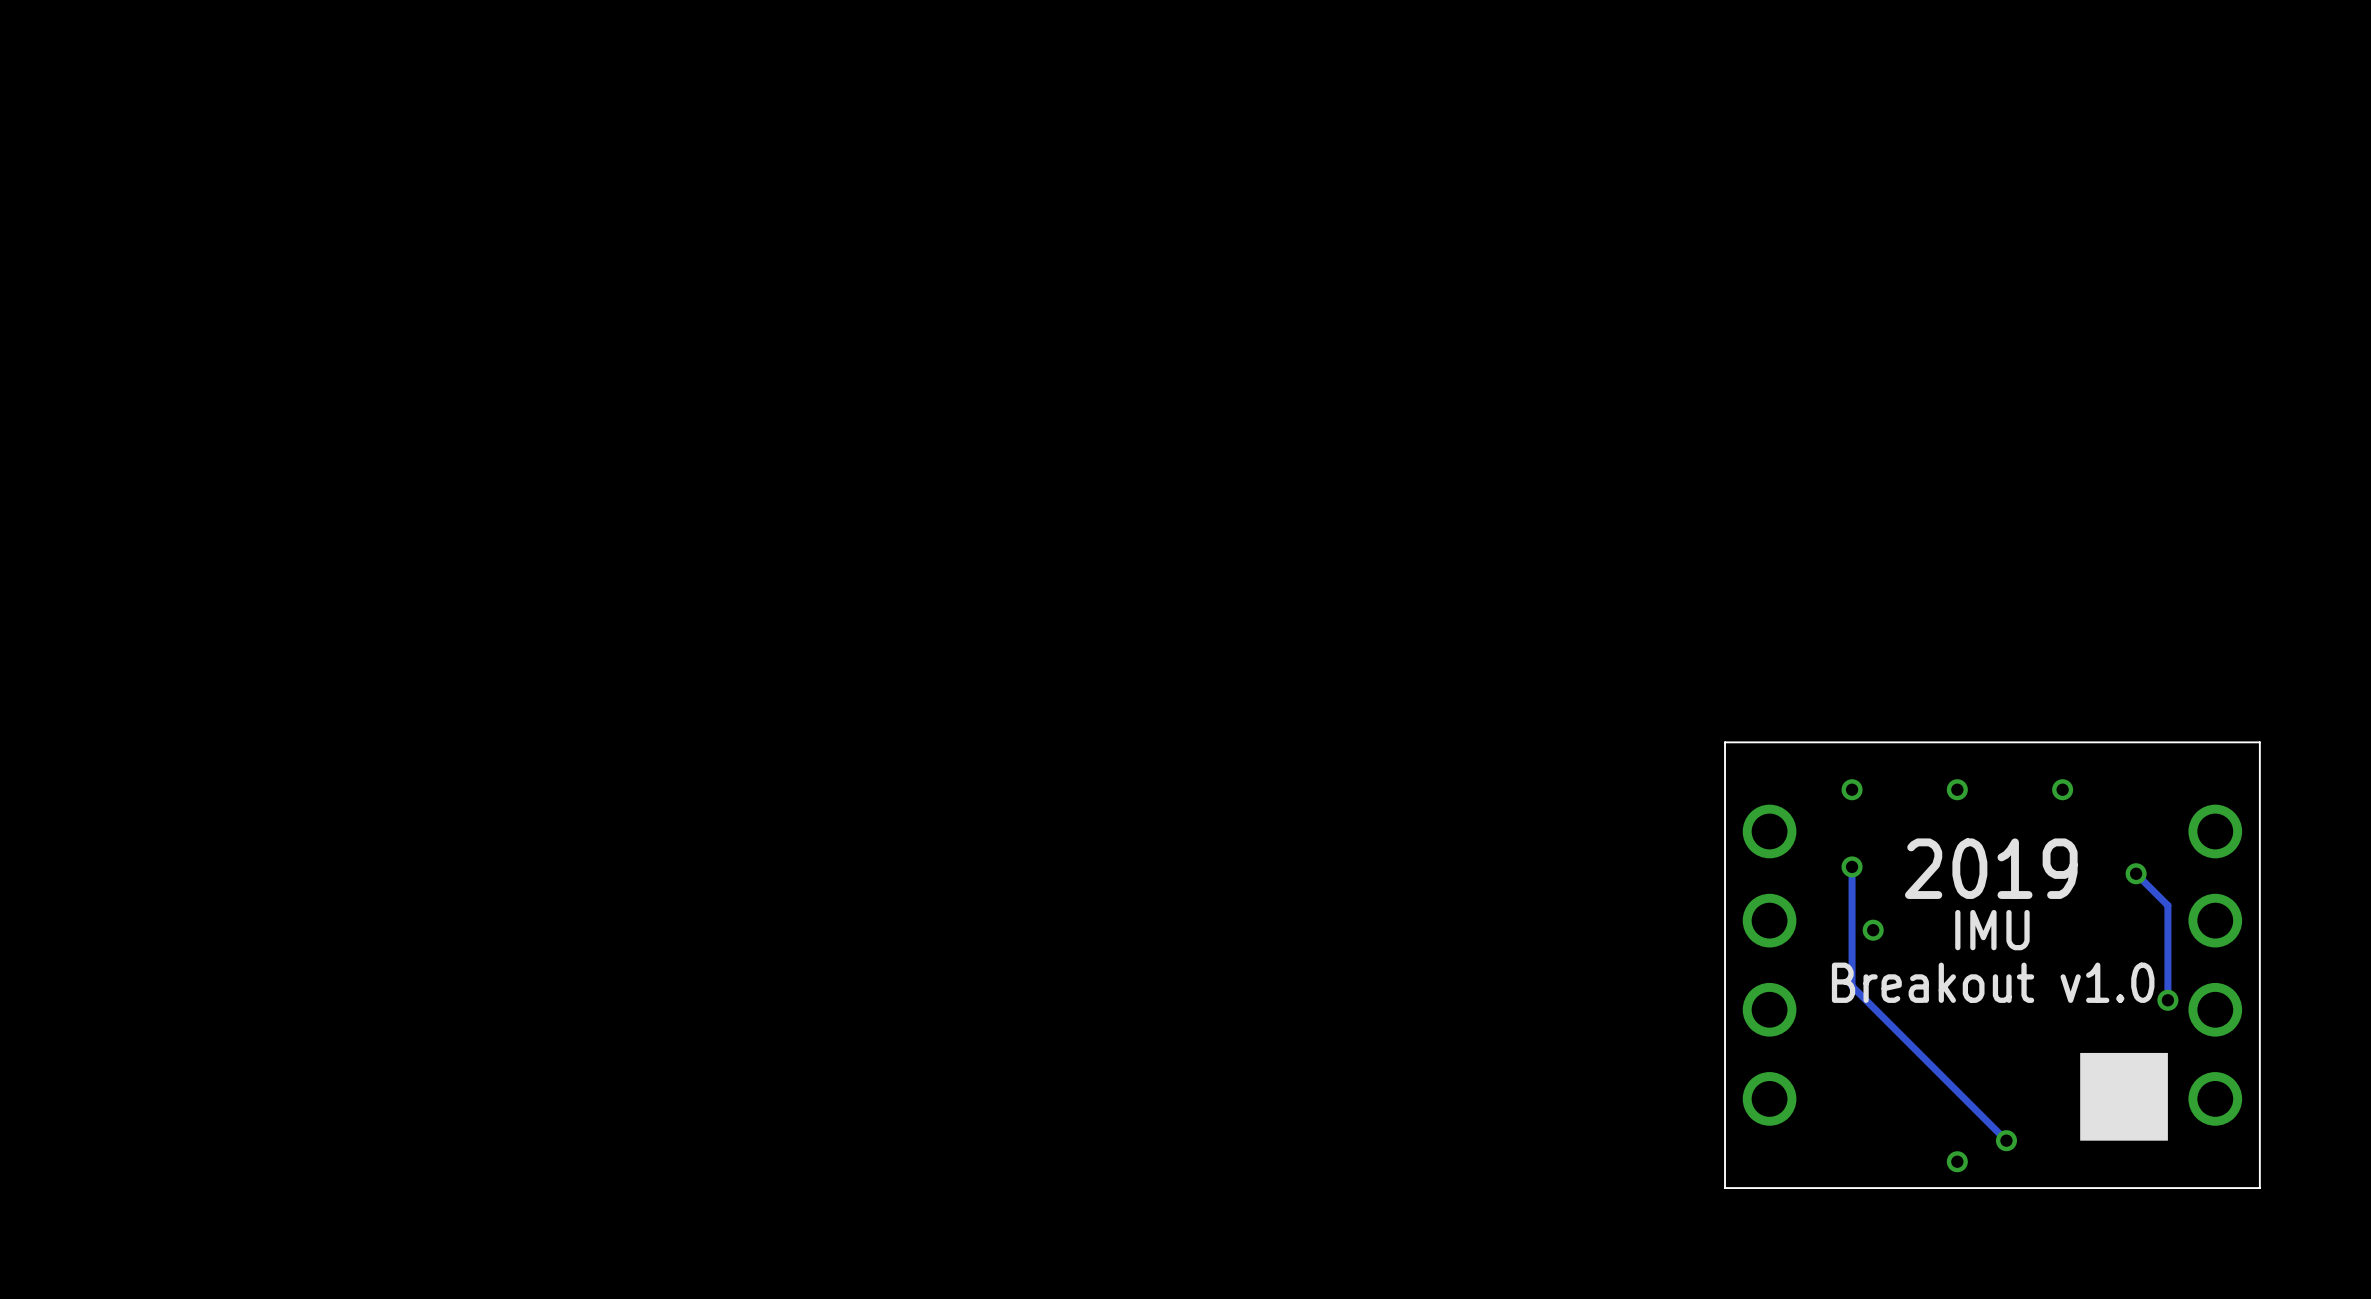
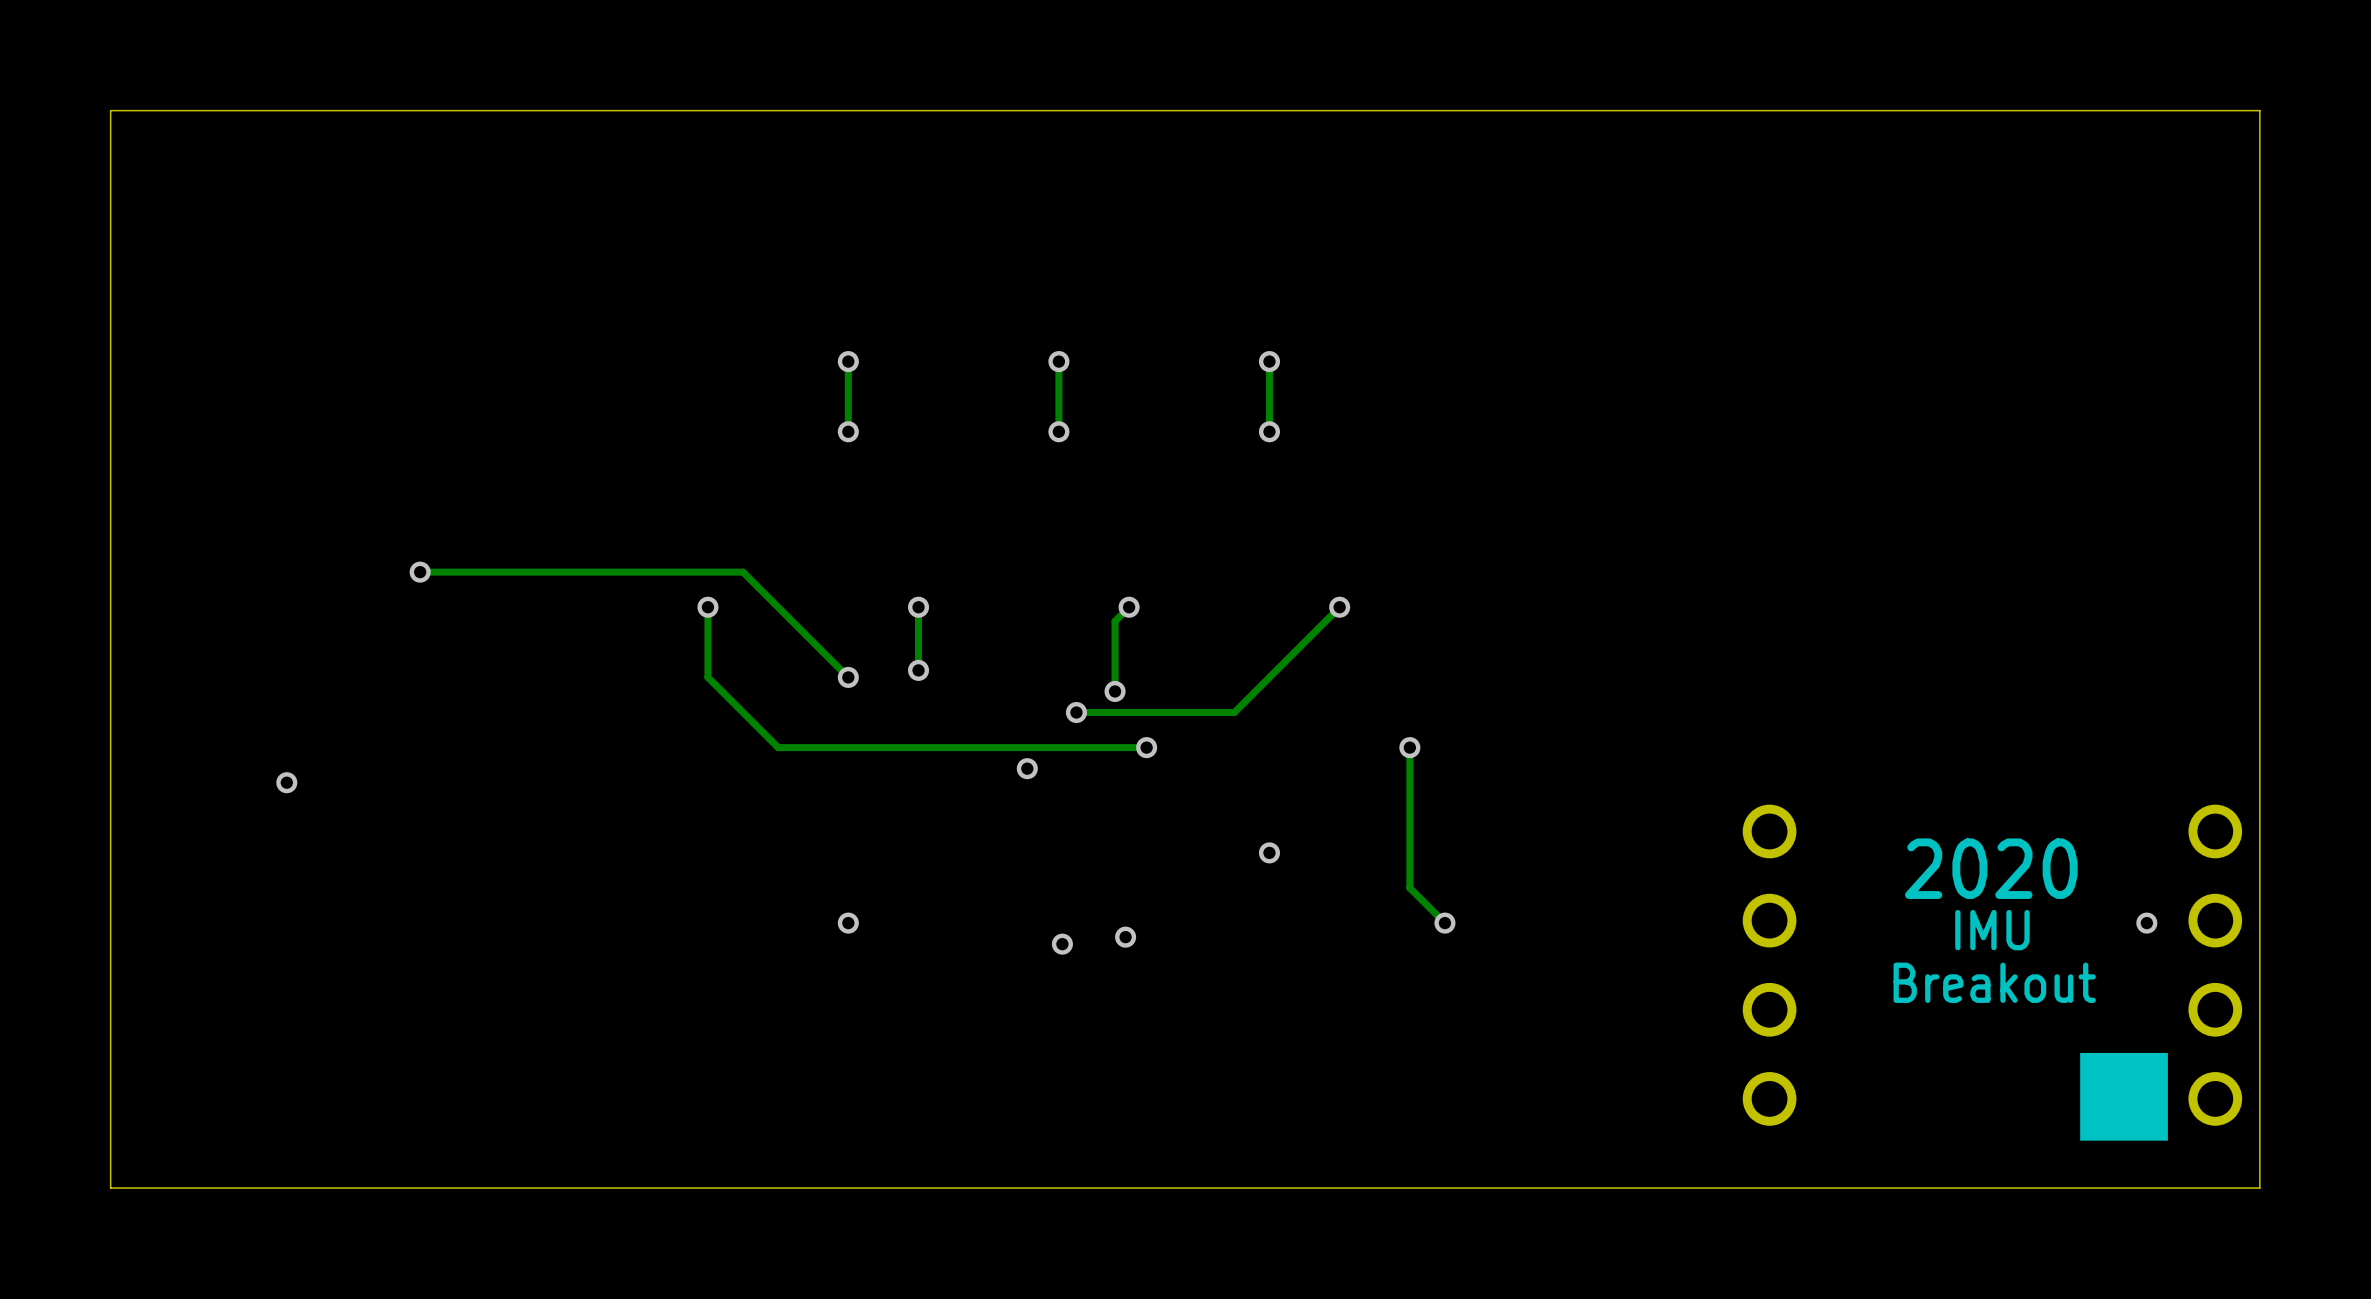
track: none -> (848, 361) (848, 431)
via: none -> (848, 361)
track: none -> (1058, 361) (1058, 431)
via: none -> (1058, 361)
track: none -> (1269, 361) (1269, 431)
via: none -> (1269, 361)
via: none -> (848, 431)
via: none -> (1058, 431)
via: none -> (1269, 431)
track: none -> (420, 572) (743, 572) (848, 677)
via: none -> (420, 572)
track: none -> (707, 607) (707, 677) (778, 747) (1146, 747)
via: none -> (707, 607)
track: none -> (918, 607) (918, 670)
via: none -> (918, 607)
track: none -> (1129, 607) (1115, 621) (1115, 691)
via: none -> (1129, 607)
track: none -> (1339, 607) (1234, 712) (1076, 712)
via: none -> (1339, 607)
via: none -> (918, 670)
via: none -> (848, 677)
via: none -> (1115, 691)
via: none -> (1076, 712)
board edge: (2259, 742) (1725, 742) (1725, 1188) -> (2259, 742) (2259, 110) (110, 110) (110, 1188) (1725, 1188)
via: none -> (1146, 747)
track: none -> (1409, 747) (1409, 887) (1444, 923)
via: none -> (1409, 747)
via: none -> (1027, 768)
via: none -> (286, 782)
via: (1852, 789) -> none
via: (1957, 789) -> none
via: (2062, 789) -> none
via: none -> (1269, 852)
track: (1852, 866) (1852, 986) (2006, 1140) -> none
via: (1852, 866) -> none
text: 2019 (1991, 868) -> 2020 (1991, 868)
track: (2136, 873) (2167, 905) (2167, 1000) -> none
via: (2136, 873) -> none
via: none -> (848, 923)
via: none -> (1444, 923)
via: none -> (2146, 923)
via: (1873, 930) -> none
via: none -> (1125, 937)
via: none -> (1062, 944)
text: Breakout v1.0 (1993, 982) -> Breakout (1994, 982)
via: (2167, 1000) -> none
via: (2006, 1140) -> none
via: (1957, 1161) -> none

